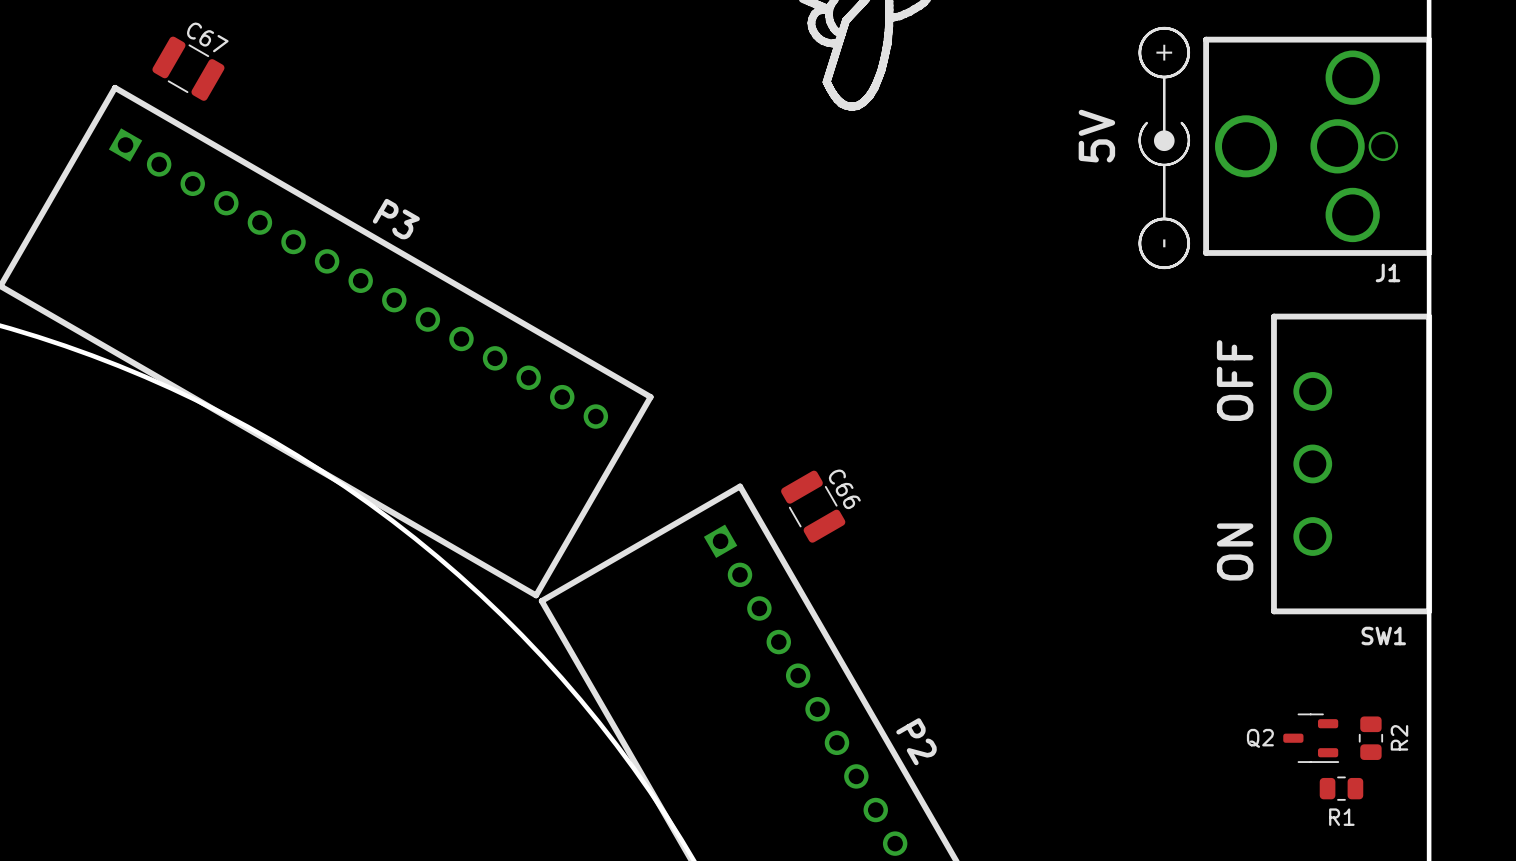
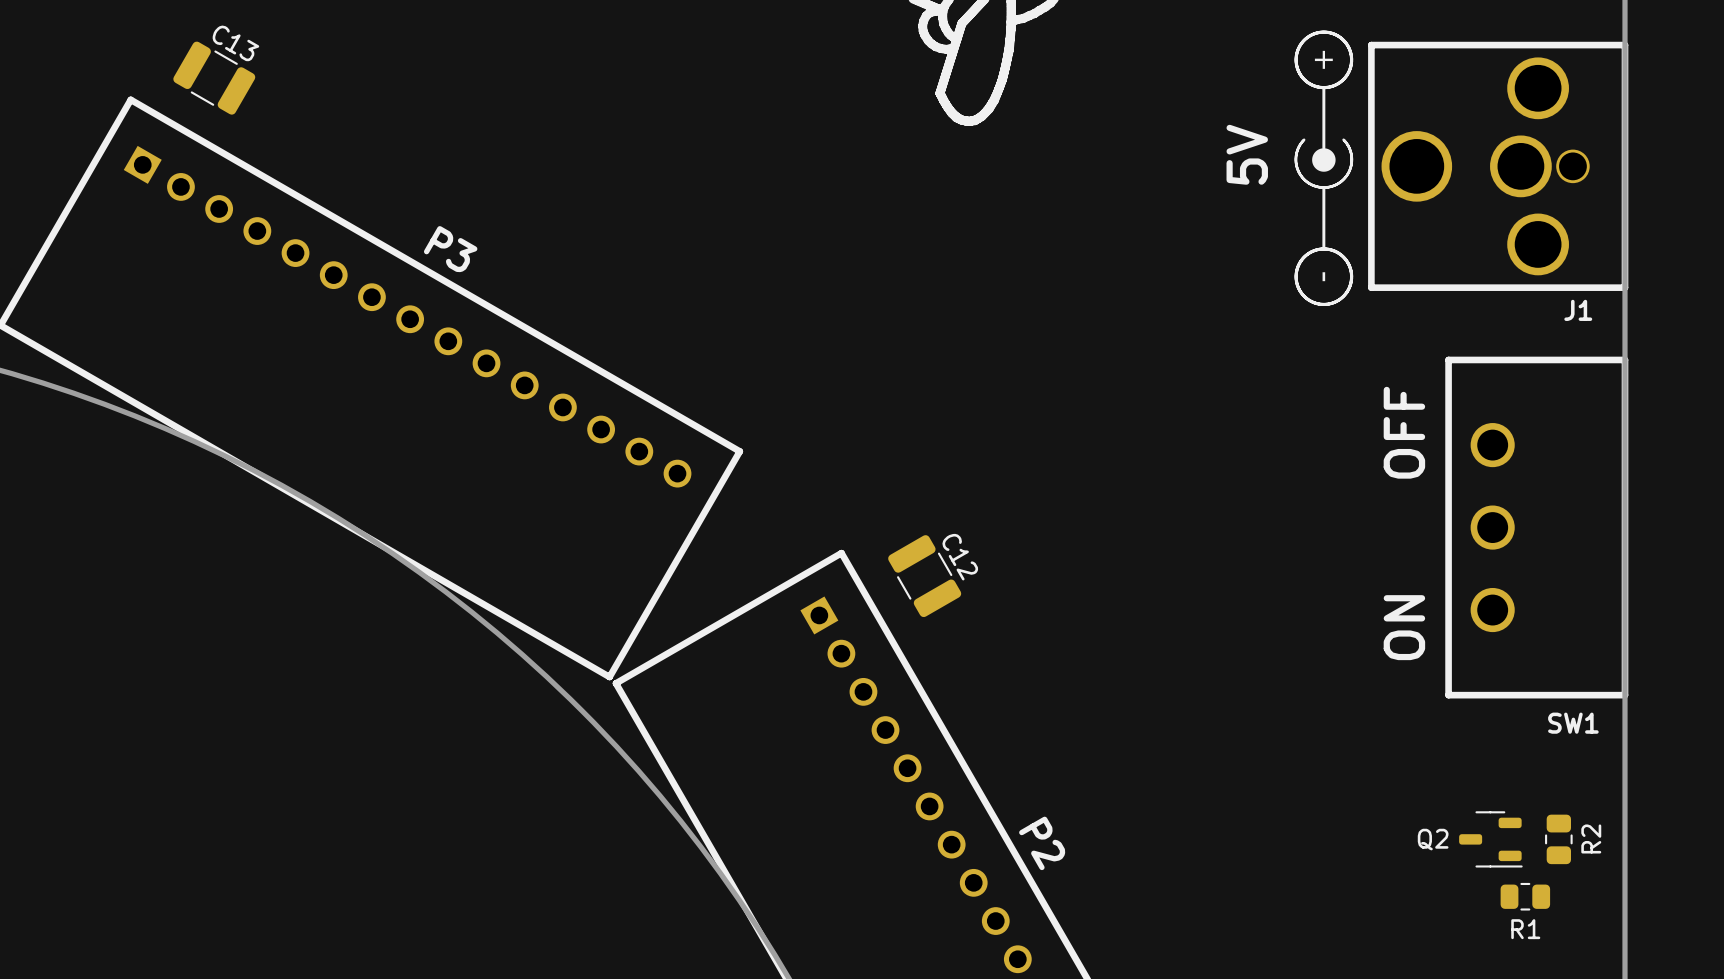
C67 name: C67 (207, 37) -> C13 (235, 43)
C66 name: C66 (844, 489) -> C12 (960, 557)

